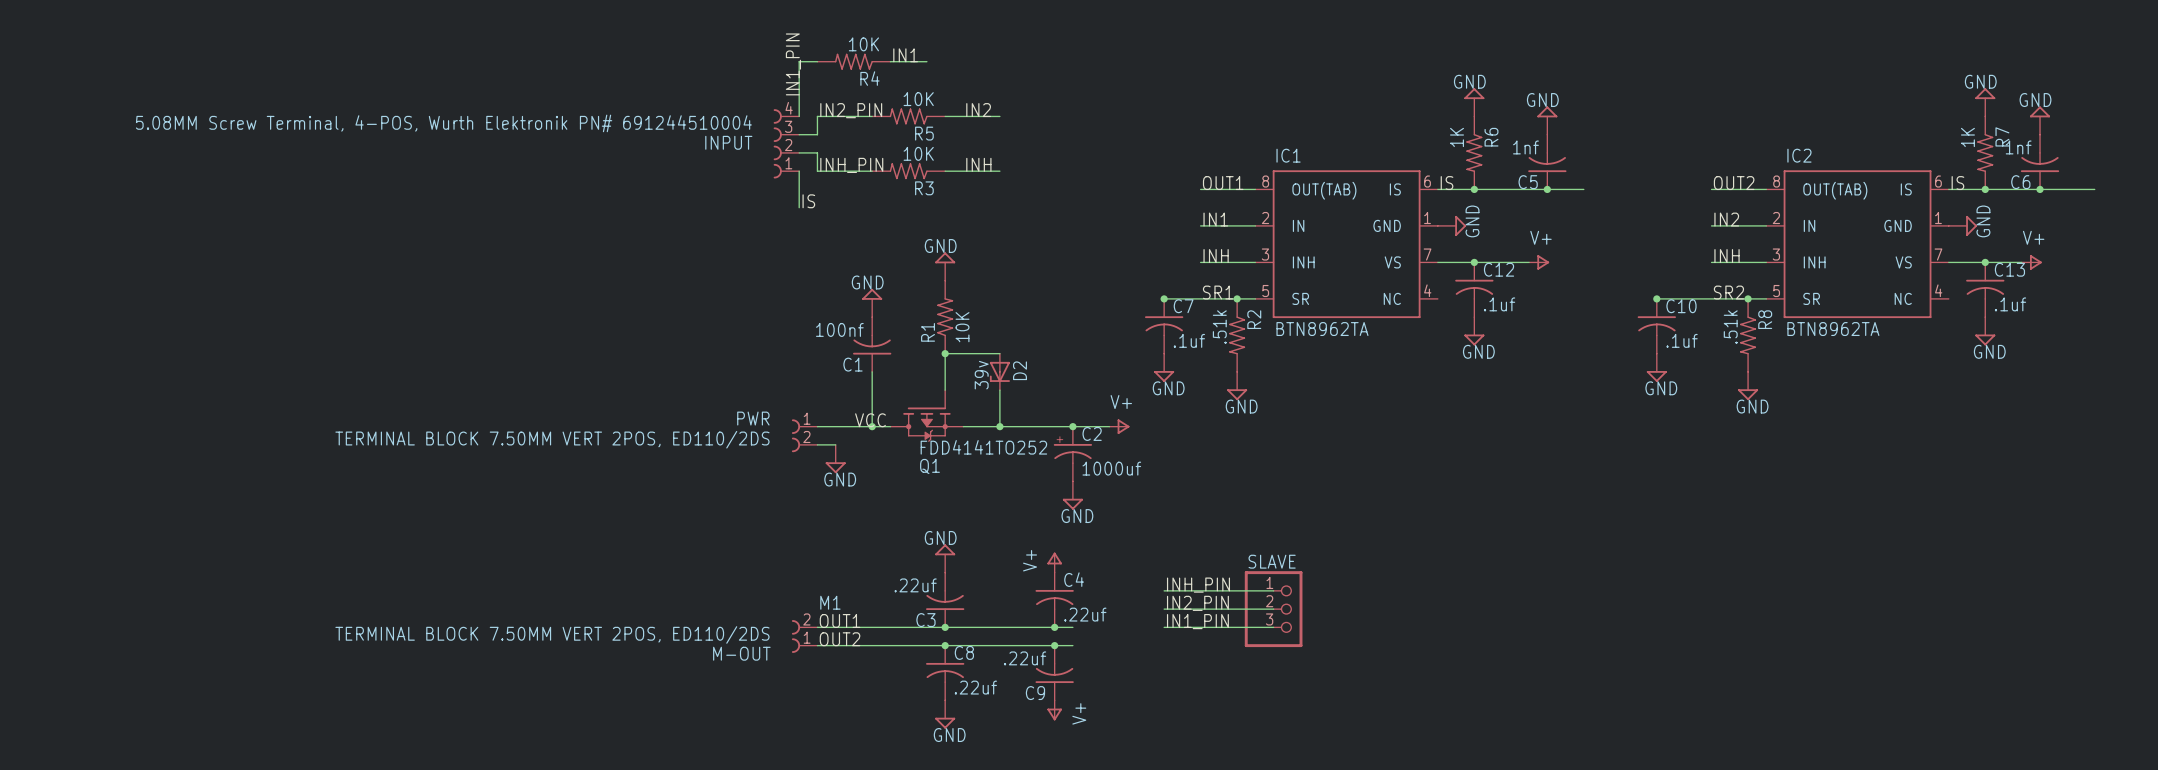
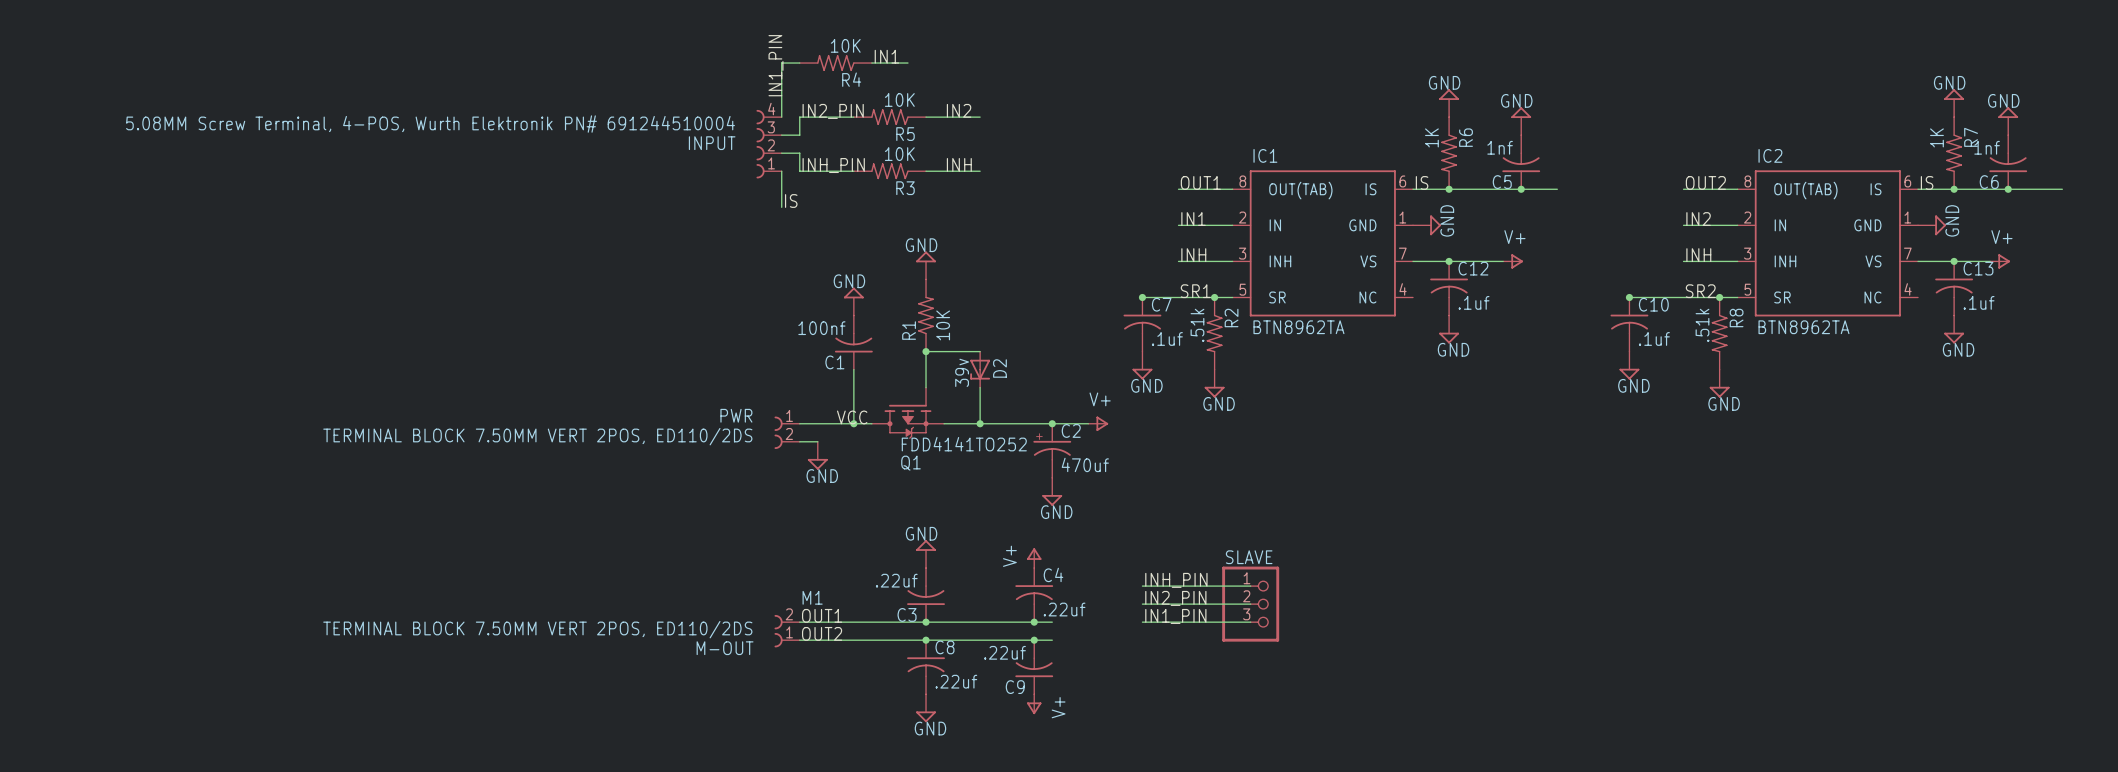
C2 value: 1000uf (1111, 468) -> 470uf (1085, 464)

